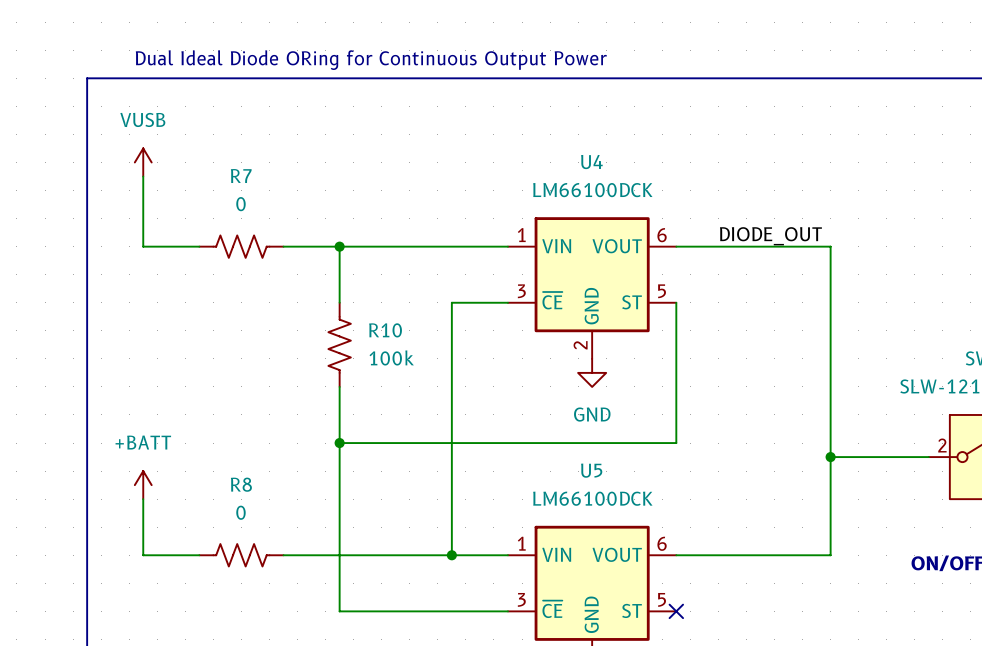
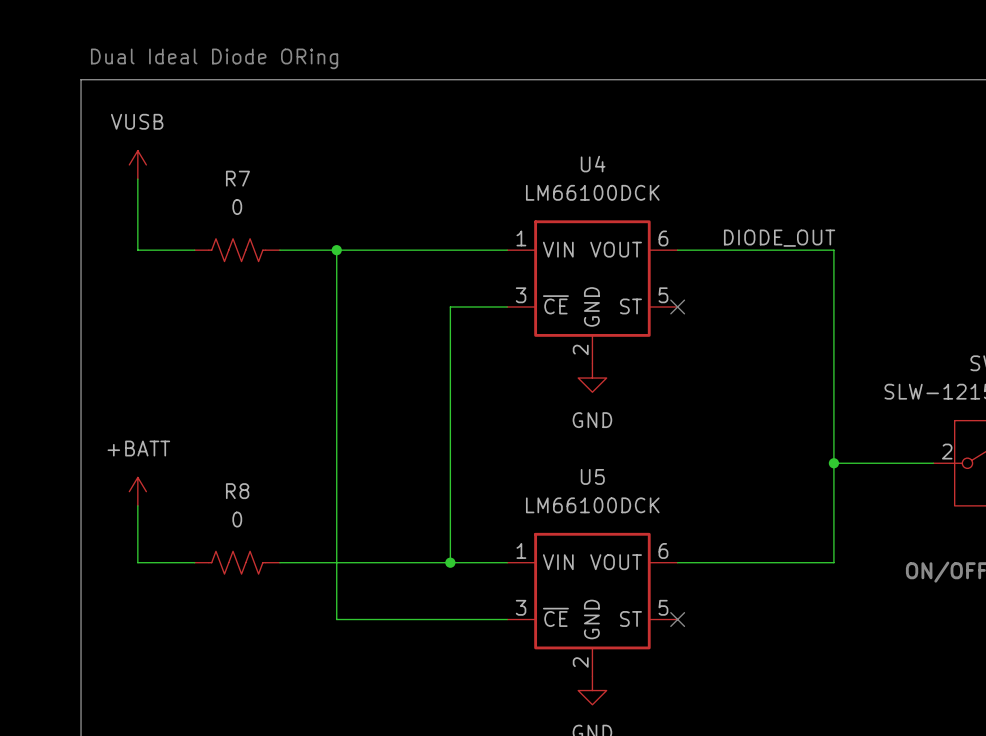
text: Dual Ideal Diode ORing for Continuous Output Power (371, 60) -> Dual Ideal Diode ORing (214, 58)
wire: none -> (336, 306) (336, 392)
wire: (676, 302) (676, 443) (339, 443) -> none
no-connect mark: none -> (677, 306)
R10: 100k (339, 344) -> none
junction: (339, 443) -> none

